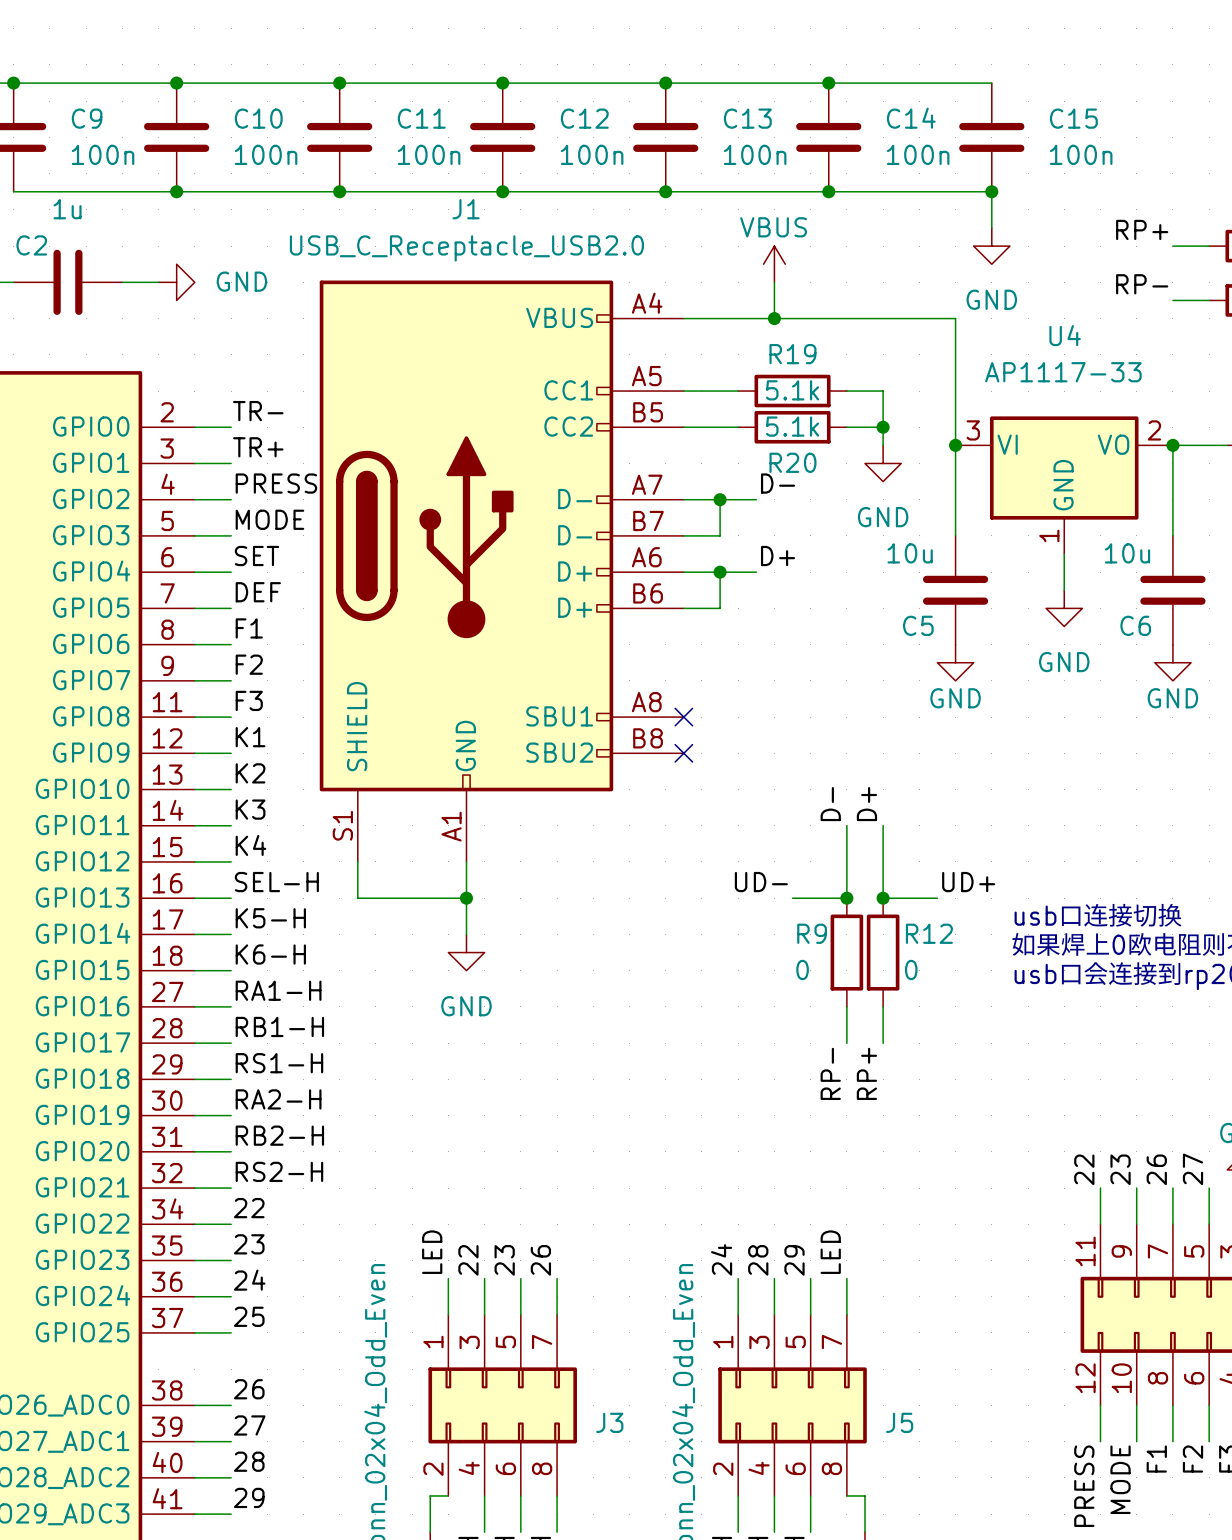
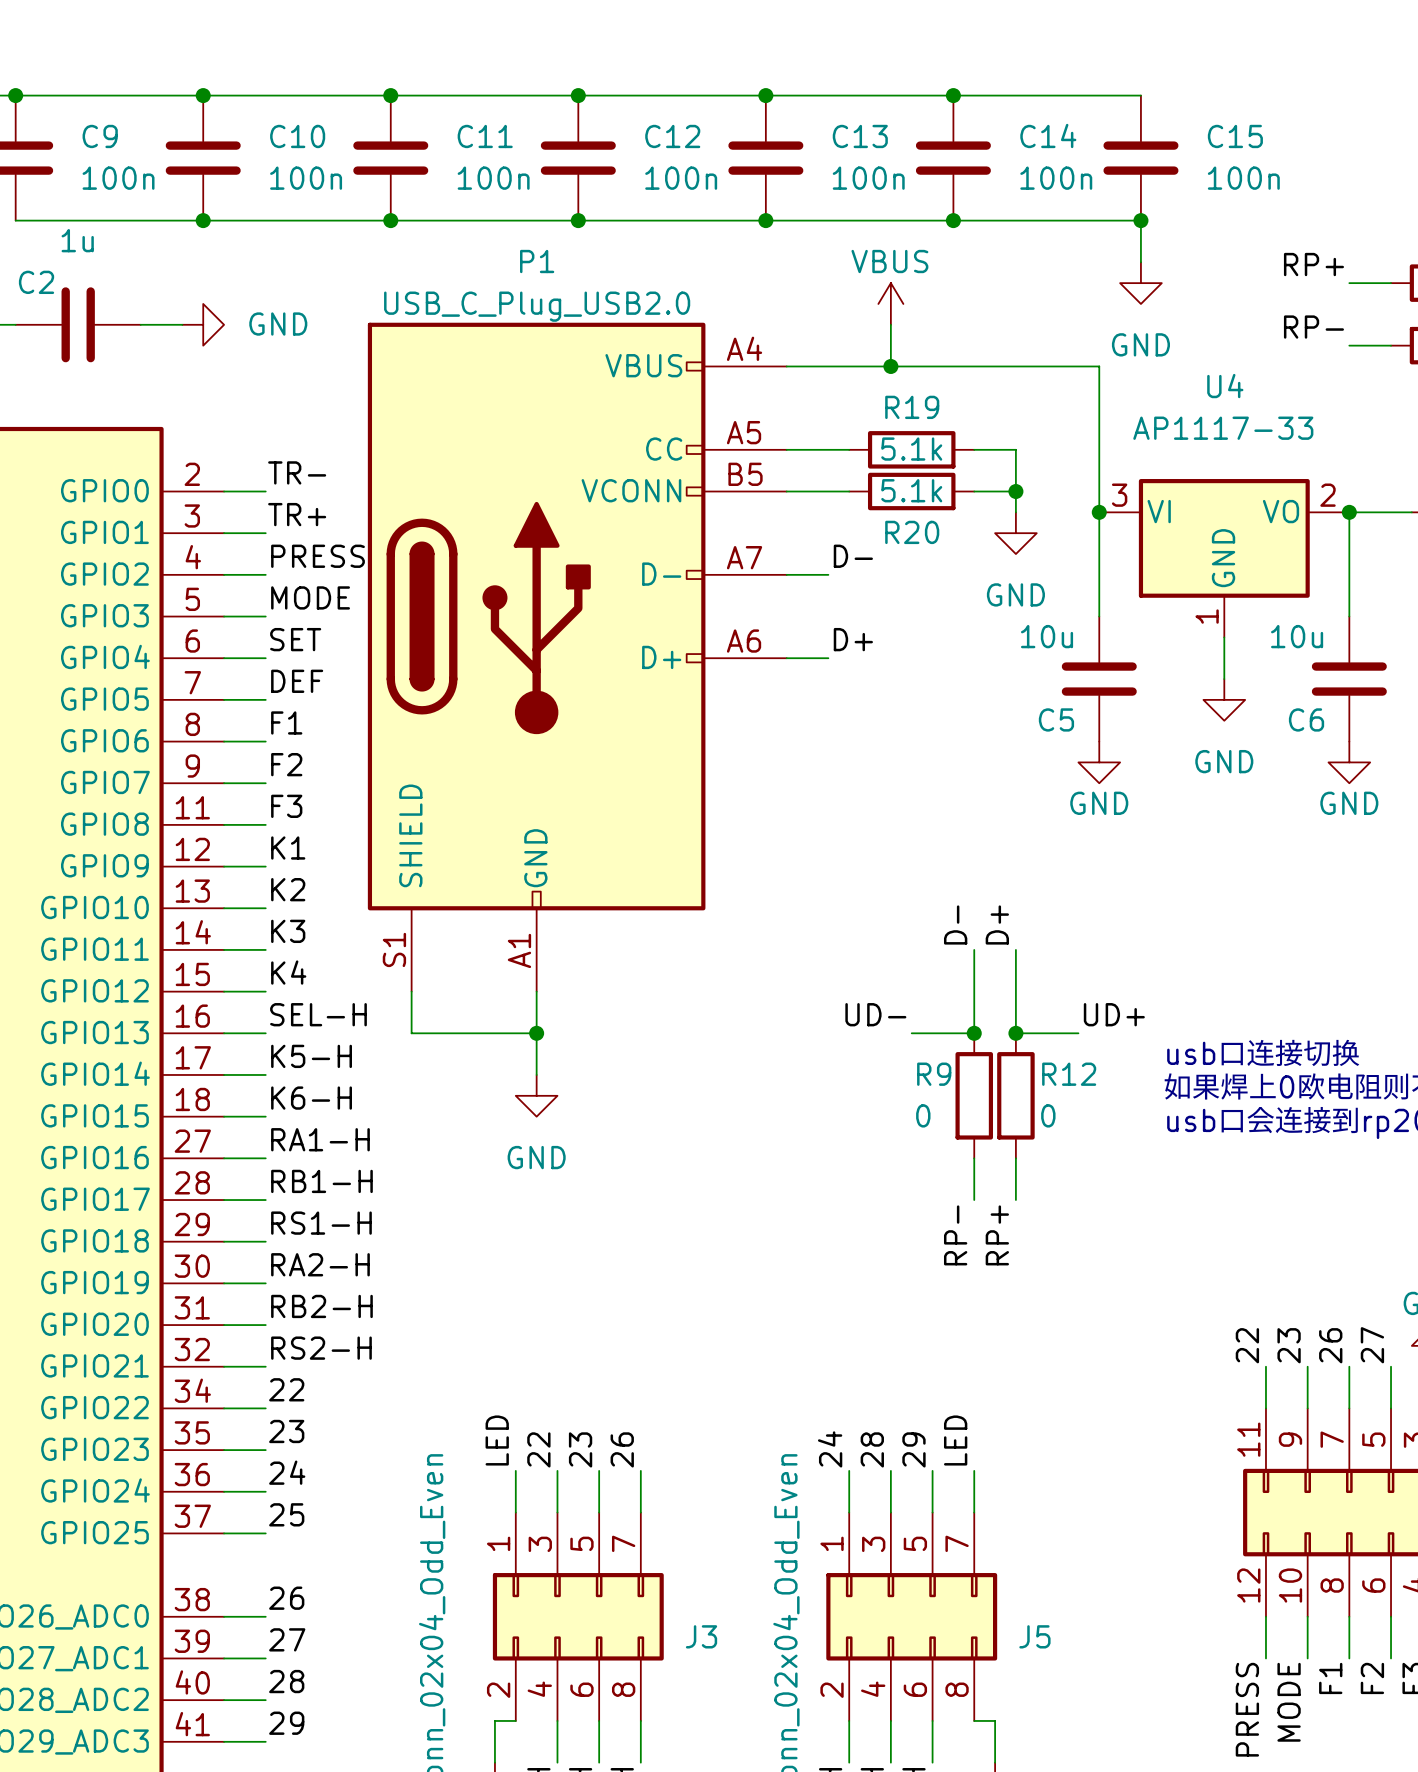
label position: D- (778, 483) -> D- (853, 556)
junction: (720, 499) -> none
wire: (756, 499) (720, 499) (720, 535) (683, 535) -> none
label position: D+ (778, 556) -> D+ (853, 639)
J1: USB_C_Receptacle_USB2.0 (501, 571) -> none
P1: none -> USB_C_Plug_USB2.0 (577, 657)
junction: (720, 572) -> none
wire: (756, 572) (720, 572) (720, 608) (683, 608) -> none
no-connect mark: (683, 717) -> none
no-connect mark: (683, 753) -> none

